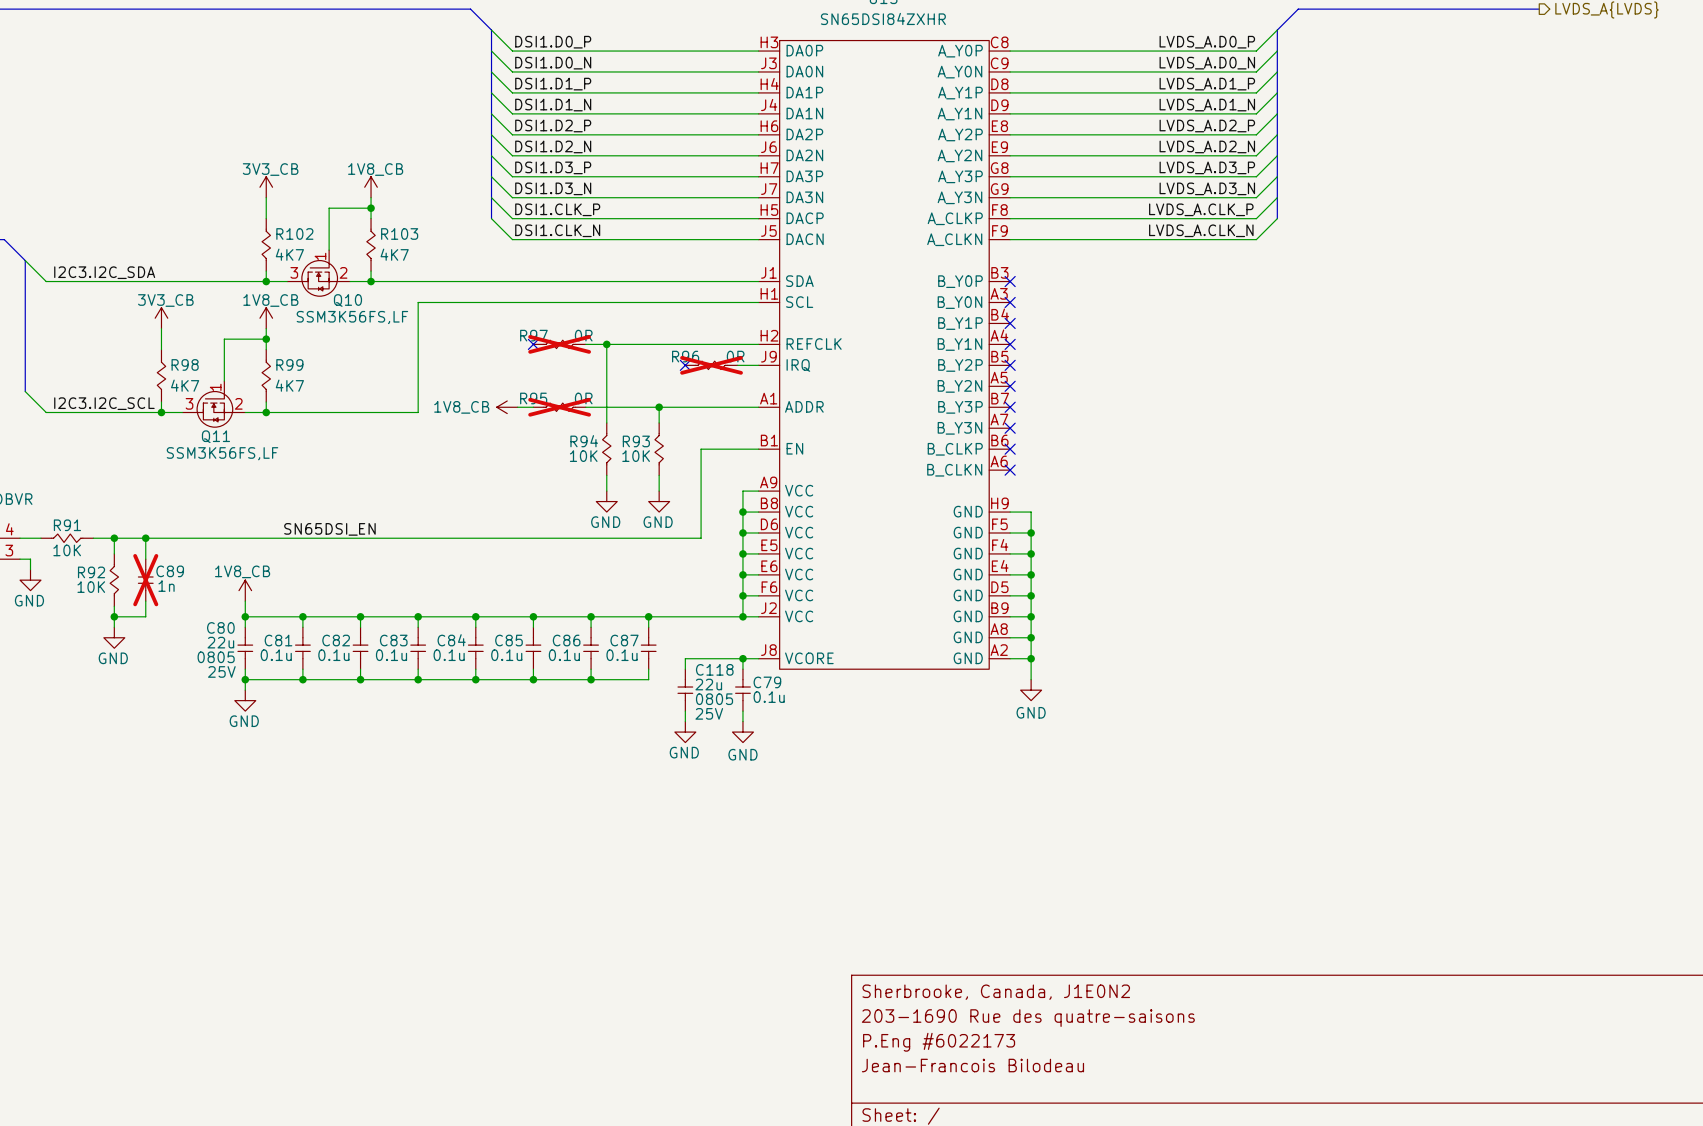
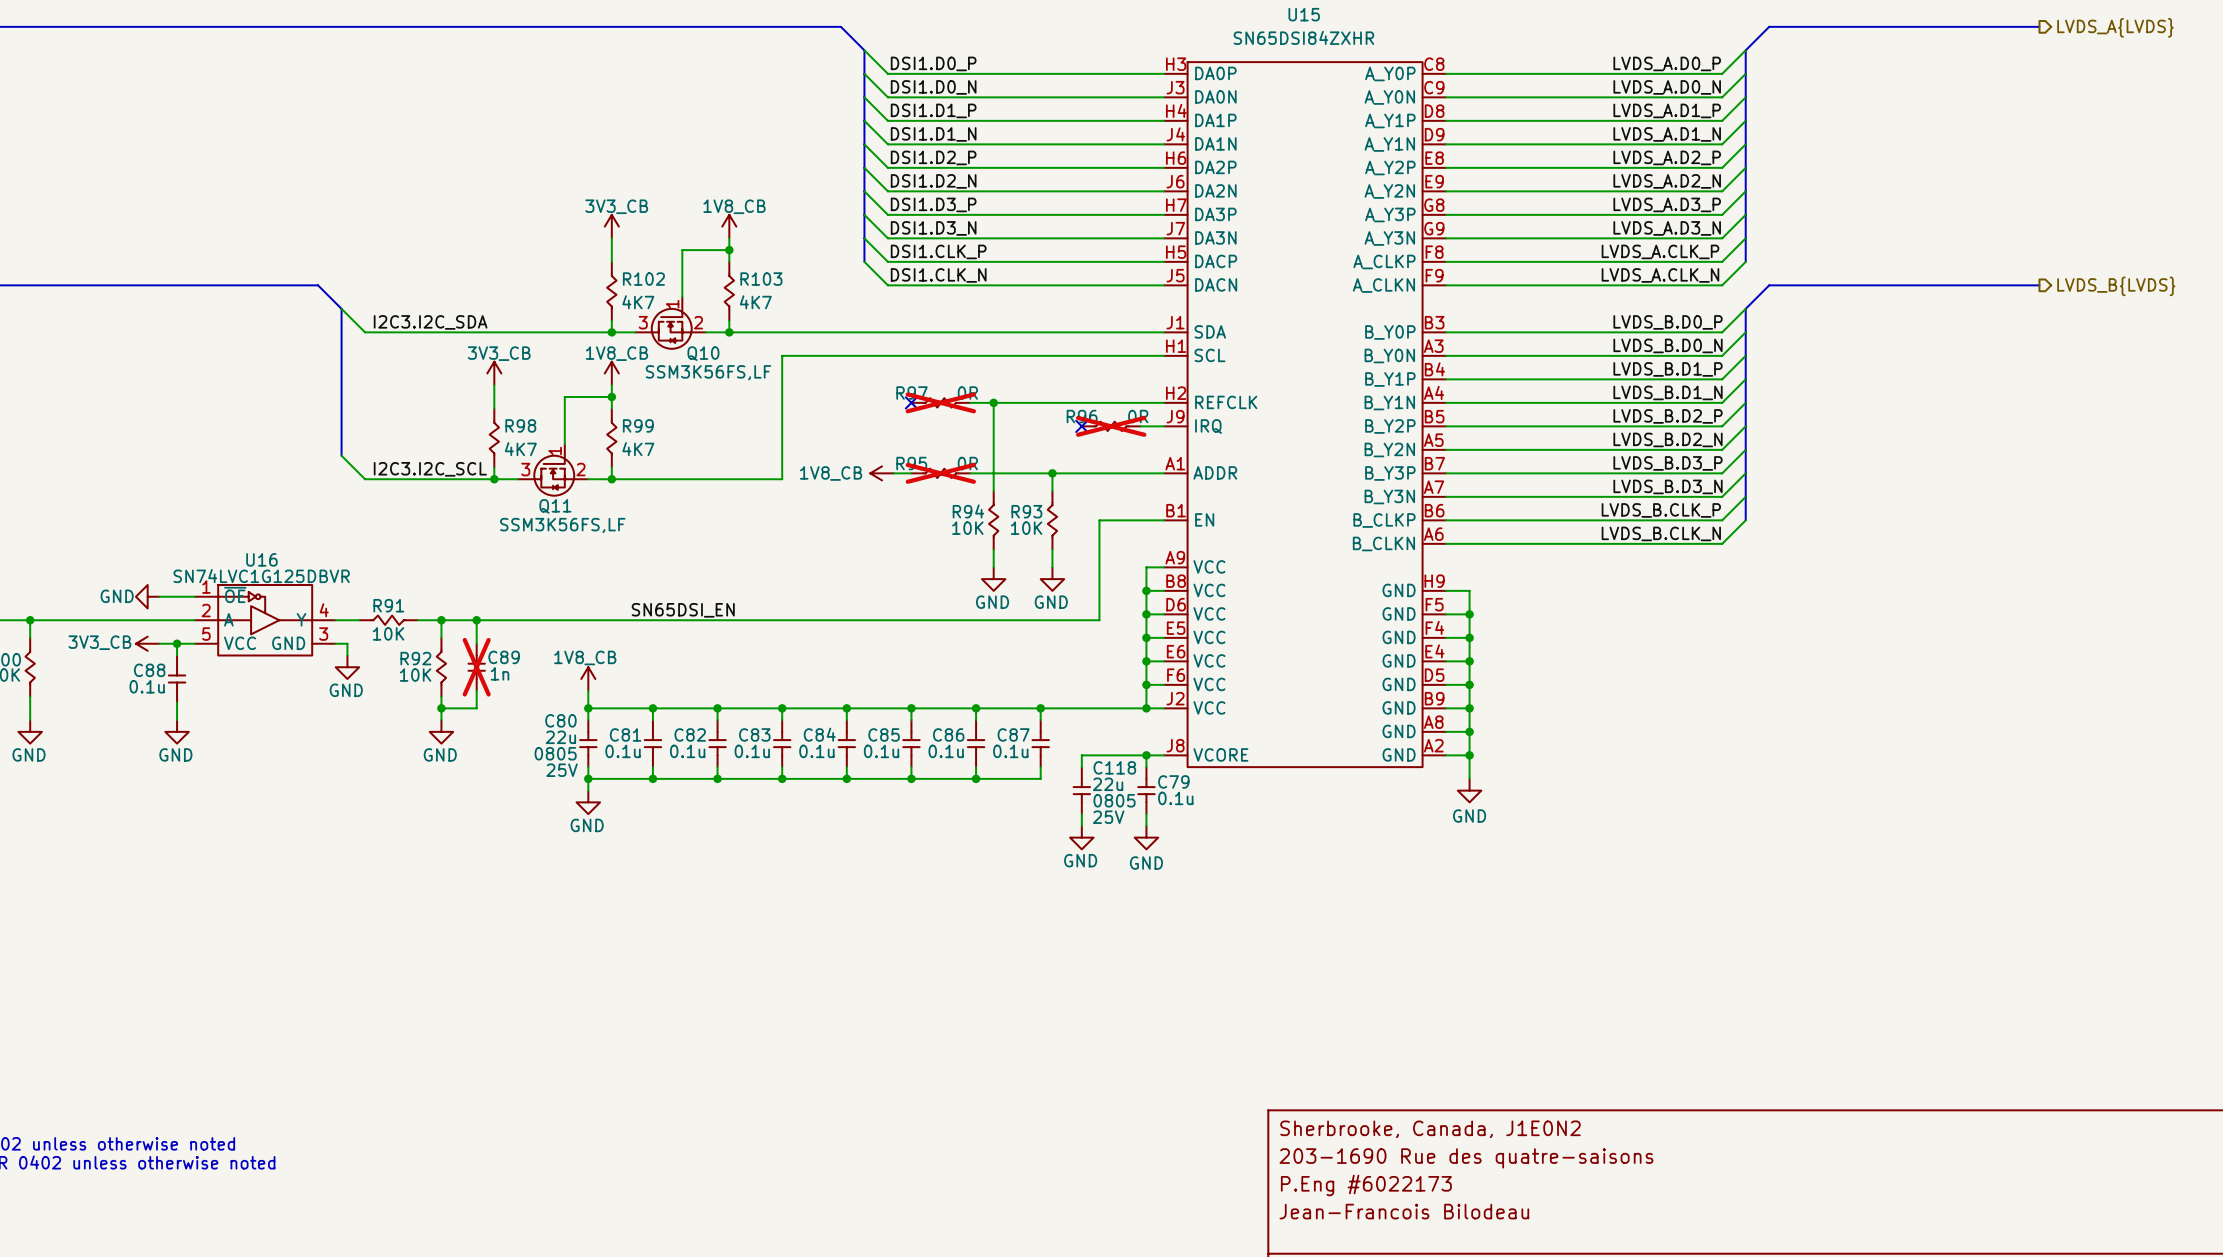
bus: none -> (2039, 285) (1769, 285) (1745, 308) (1745, 520)
hierarchical label: none -> LVDS_B{LVDS} (2116, 286)
wire: none -> (1745, 308) (1722, 332) (1446, 332)
label: none -> LVDS_B.D0_P (1668, 322)
no-connect mark: (1010, 281) -> none
wire: none -> (1745, 332) (1722, 355)
label: none -> LVDS_B.D0_N (1668, 345)
wire: none -> (1446, 355) (1722, 355)
no-connect mark: (1010, 302) -> none
wire: none -> (1745, 355) (1722, 379) (1446, 379)
label: none -> LVDS_B.D1_P (1668, 369)
no-connect mark: (1010, 323) -> none
wire: none -> (1745, 379) (1722, 402)
label: none -> LVDS_B.D1_N (1668, 392)
wire: none -> (1446, 402) (1722, 402)
no-connect mark: (1010, 344) -> none
wire: none -> (1745, 402) (1722, 426) (1446, 426)
label: none -> LVDS_B.D2_P (1668, 416)
no-connect mark: (1010, 365) -> none
wire: none -> (1745, 426) (1722, 449)
label: none -> LVDS_B.D2_N (1668, 439)
wire: none -> (1446, 449) (1722, 449)
no-connect mark: (1010, 386) -> none
wire: none -> (1745, 449) (1722, 473) (1446, 473)
label: none -> LVDS_B.D3_P (1668, 463)
no-connect mark: (1010, 407) -> none
wire: none -> (1745, 473) (1722, 496)
label: none -> LVDS_B.D3_N (1668, 486)
wire: none -> (1446, 496) (1722, 496)
no-connect mark: (1010, 428) -> none
wire: none -> (1745, 496) (1722, 520) (1446, 520)
label: none -> LVDS_B.CLK_P (1661, 510)
no-connect mark: (1010, 449) -> none
wire: none -> (1745, 520) (1722, 543) (1446, 543)
label: none -> LVDS_B.CLK_N (1661, 533)
no-connect mark: (1010, 470) -> none

